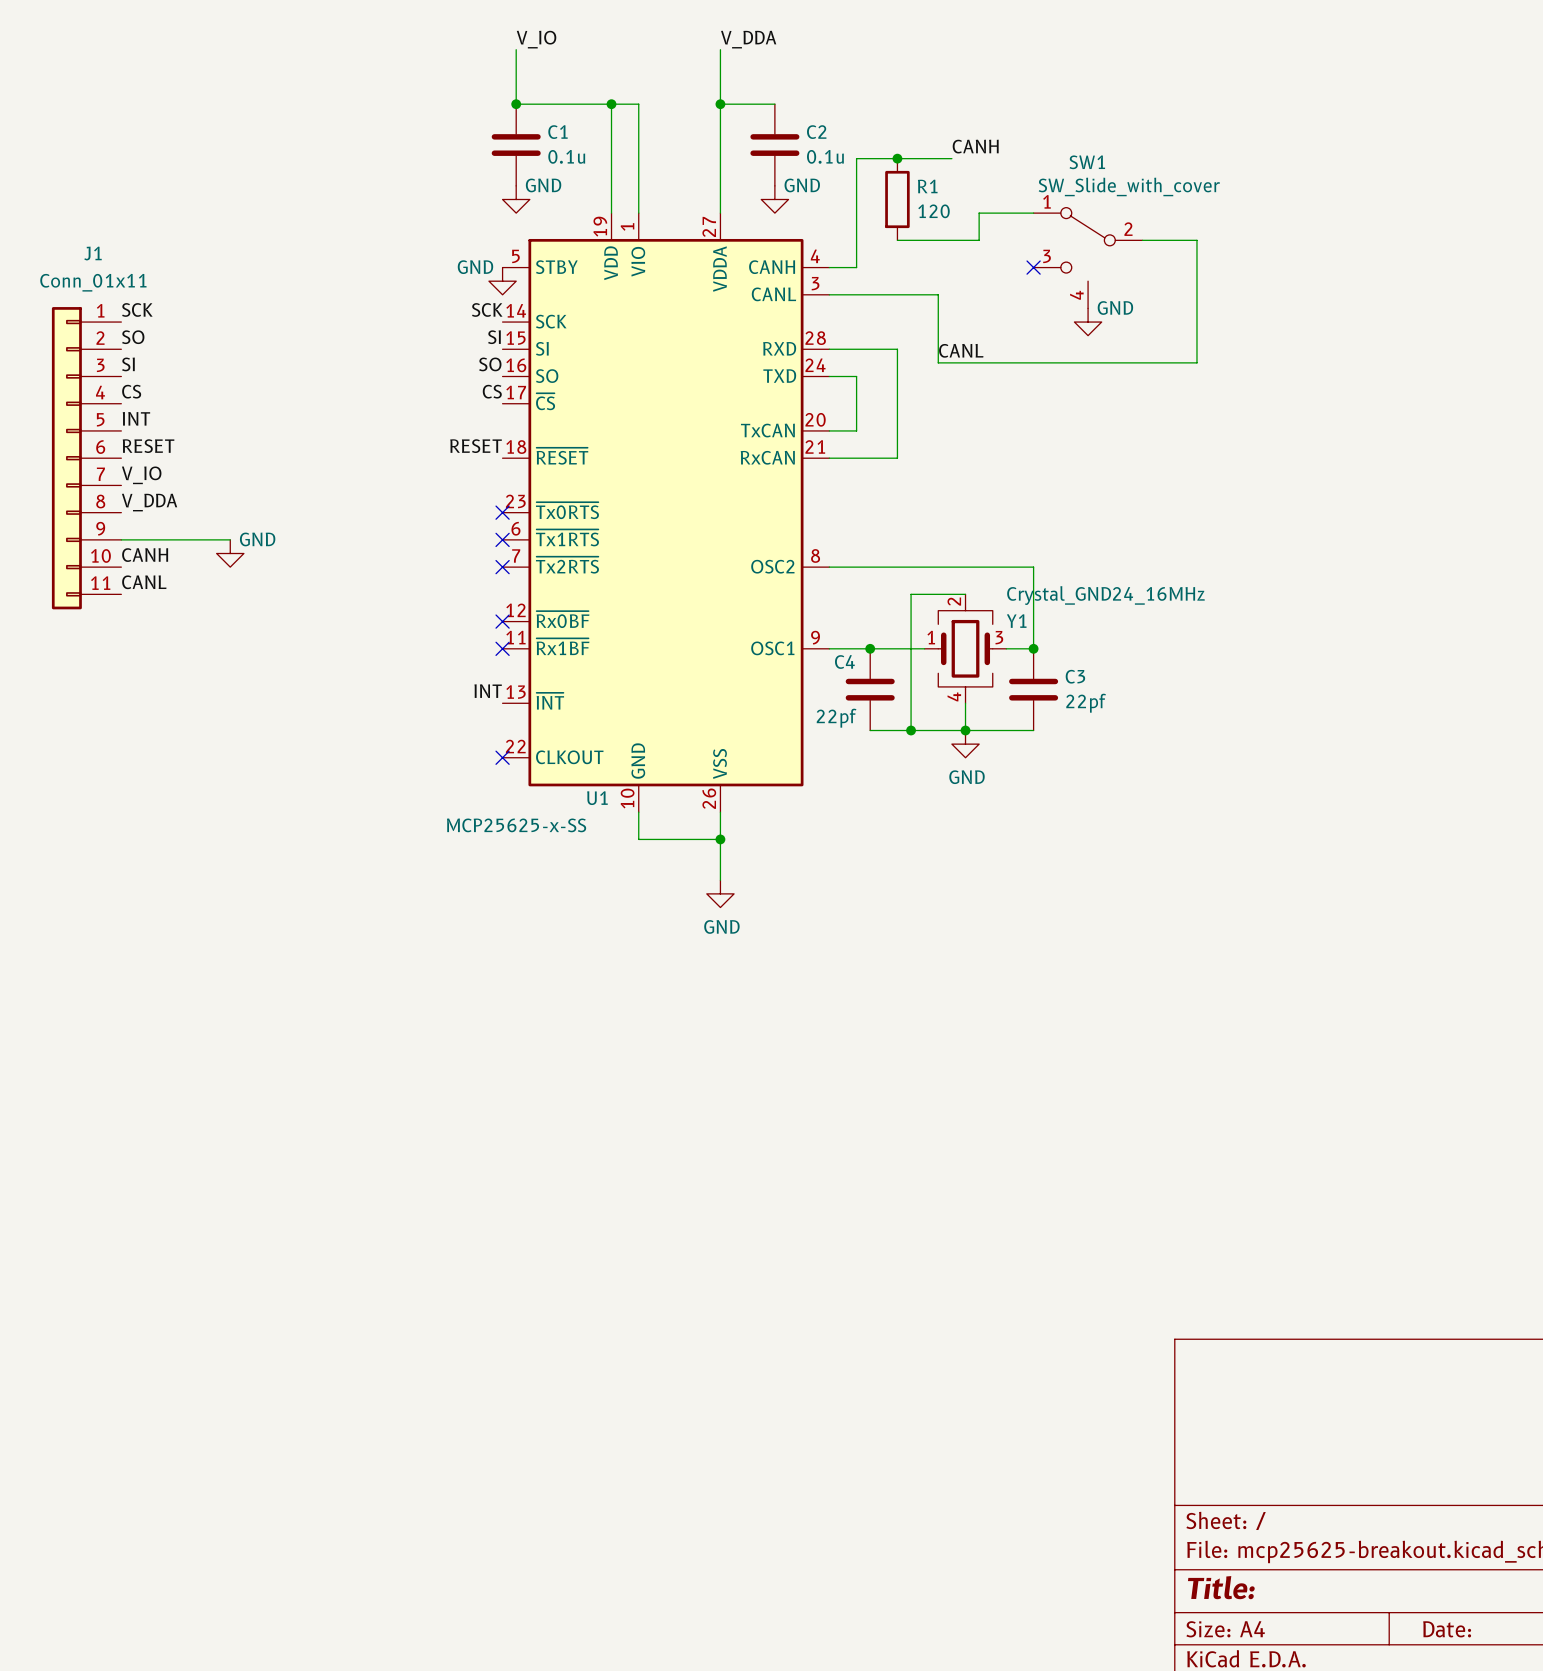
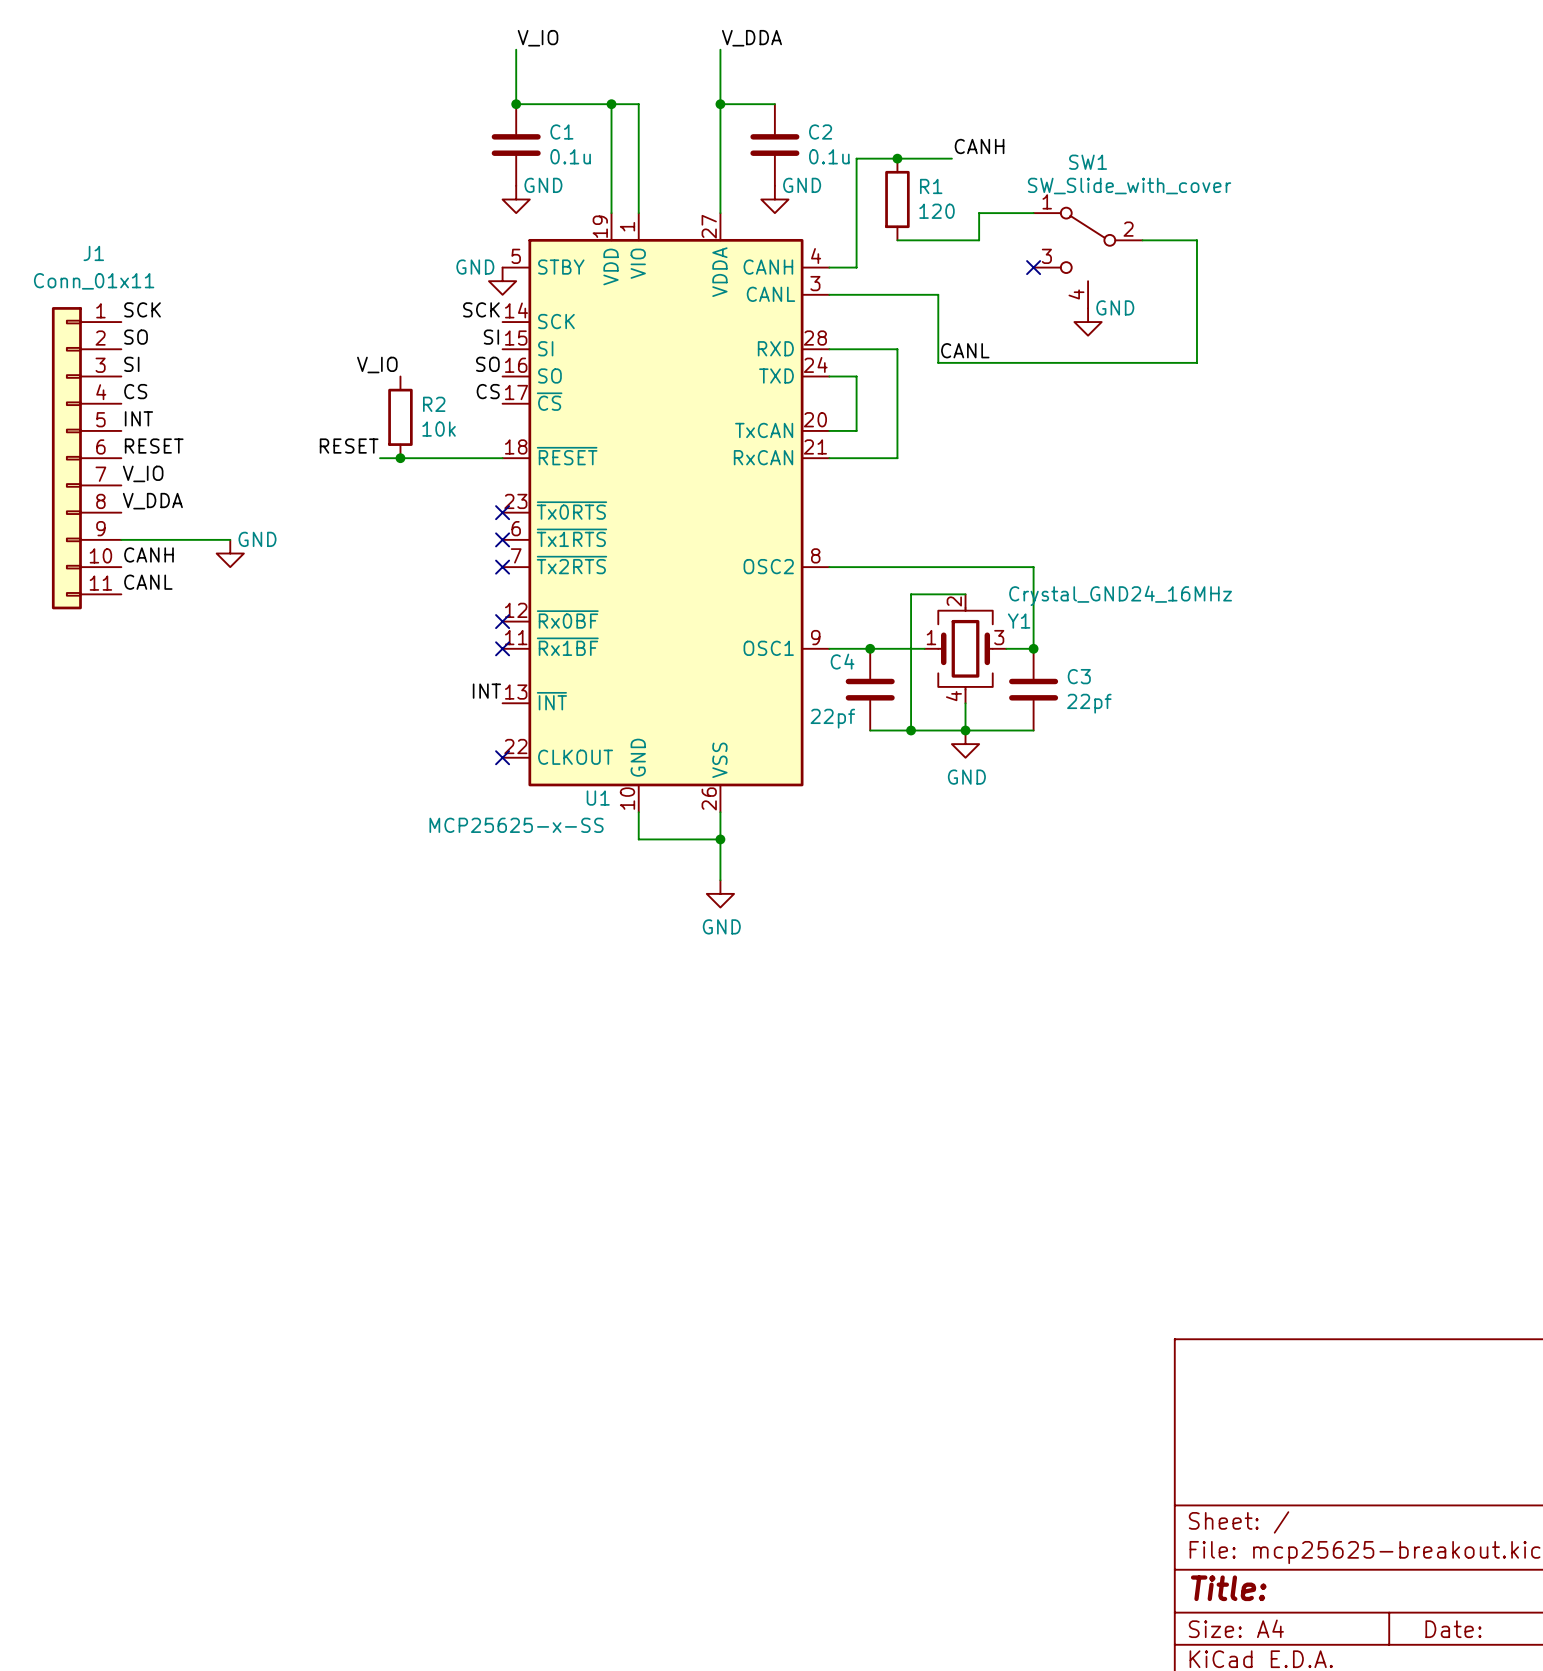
label: none -> V_IO (377, 365)
R2: none -> 10k (400, 417)
label position: RESET (476, 446) -> RESET (349, 446)
wire: none -> (380, 458) (502, 458)
junction: none -> (400, 458)

